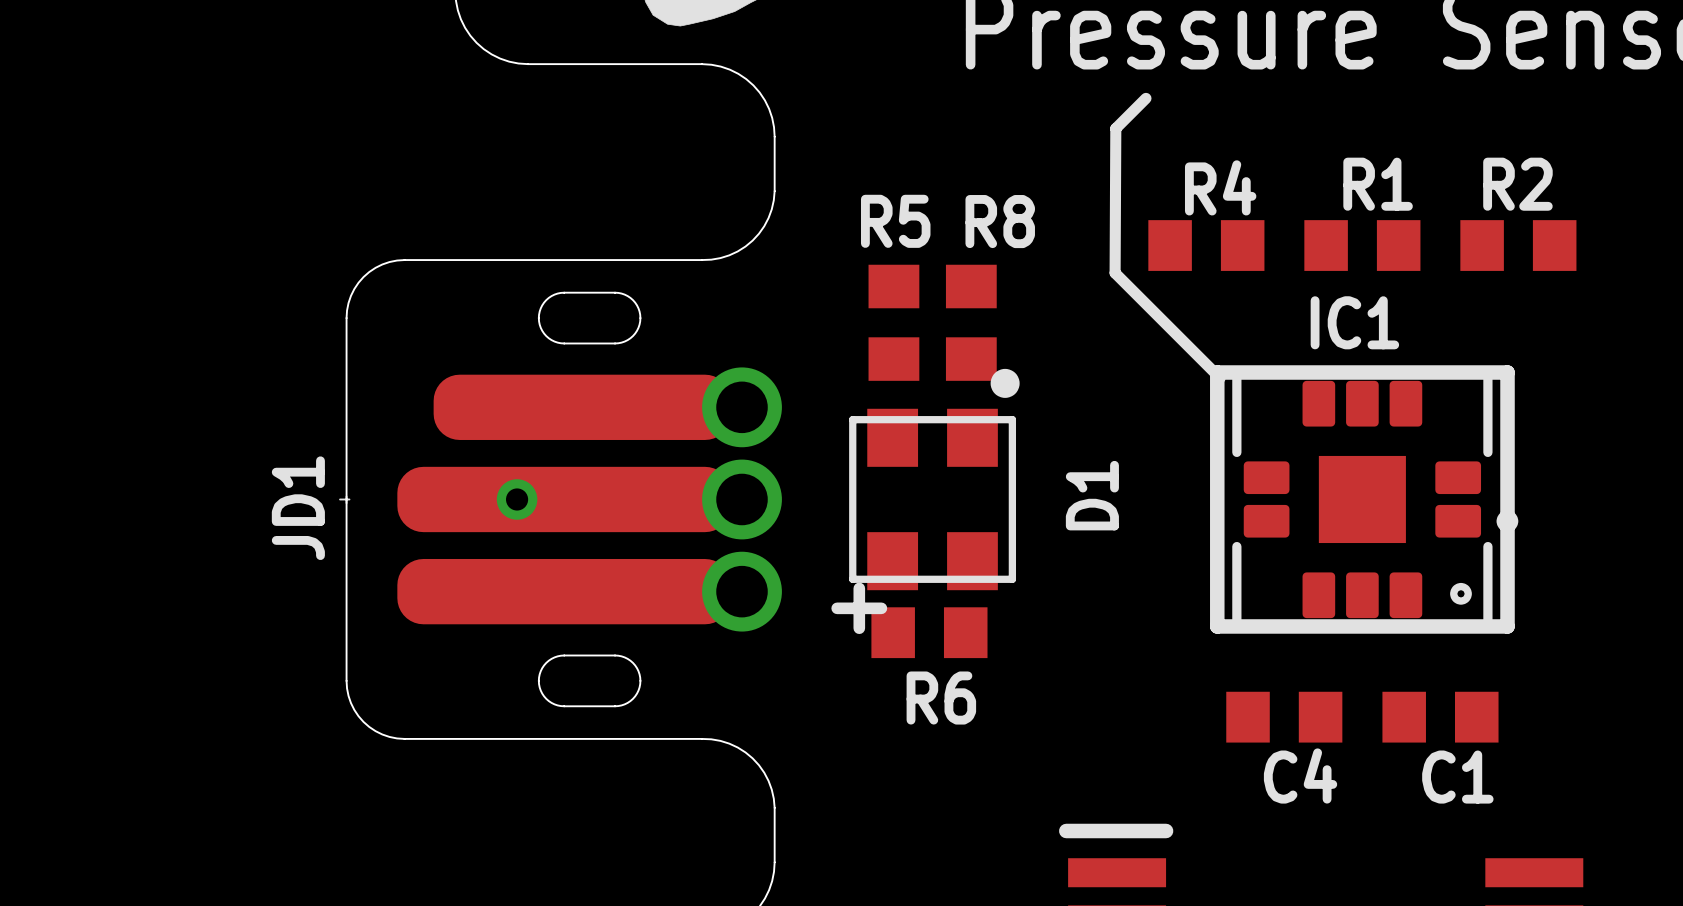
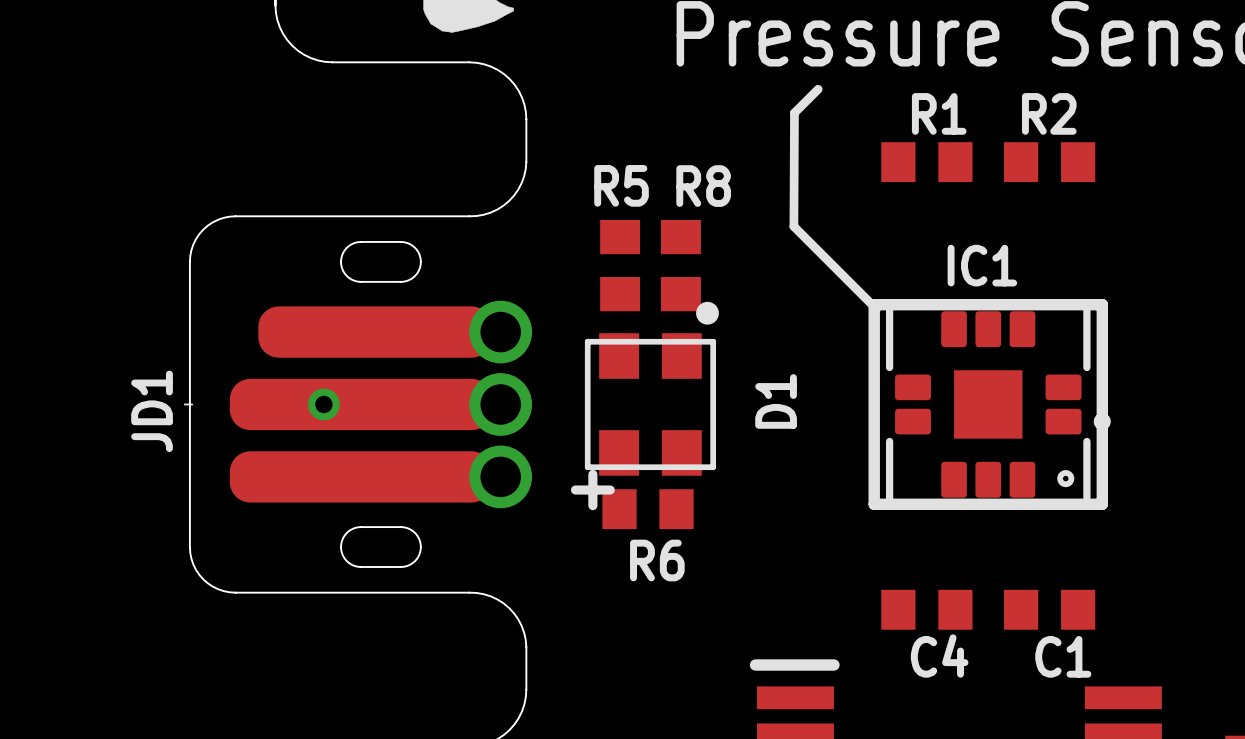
R4: (1206, 245) -> none
R1 position: (1362, 245) -> (926, 162)
R2 position: (1518, 245) -> (1049, 162)
C4 position: (1284, 717) -> (926, 609)
C1 position: (1440, 717) -> (1049, 609)

